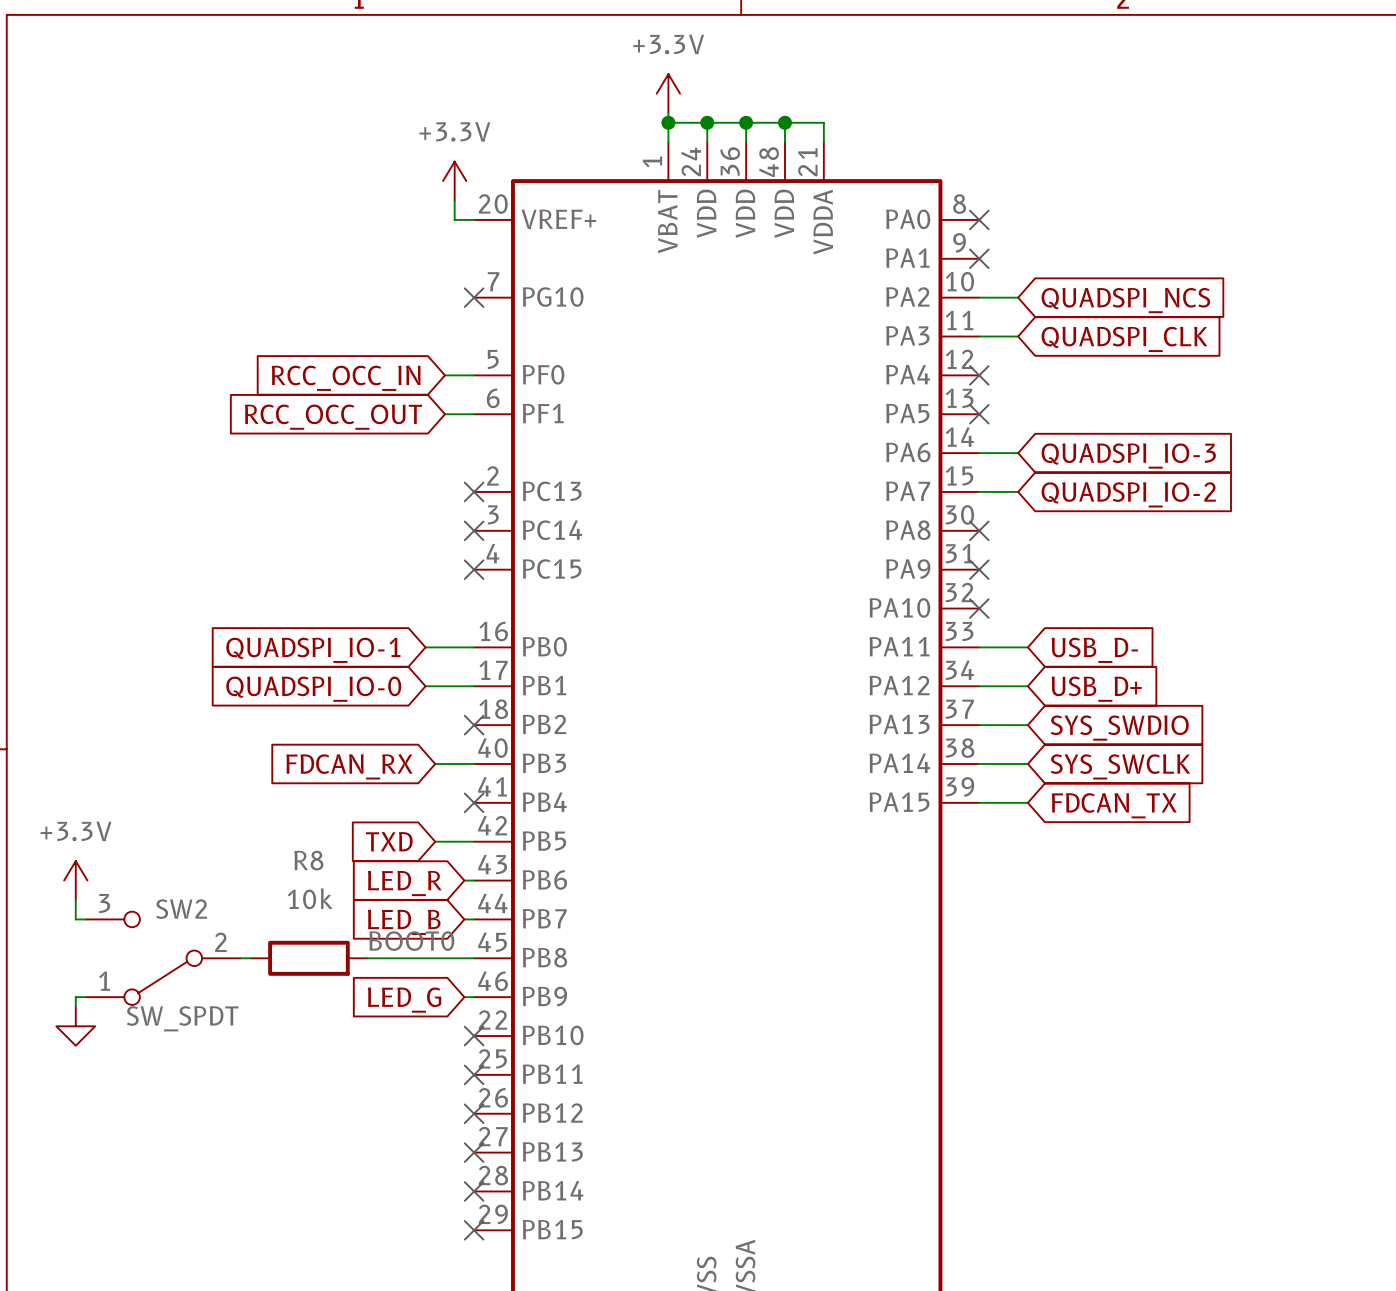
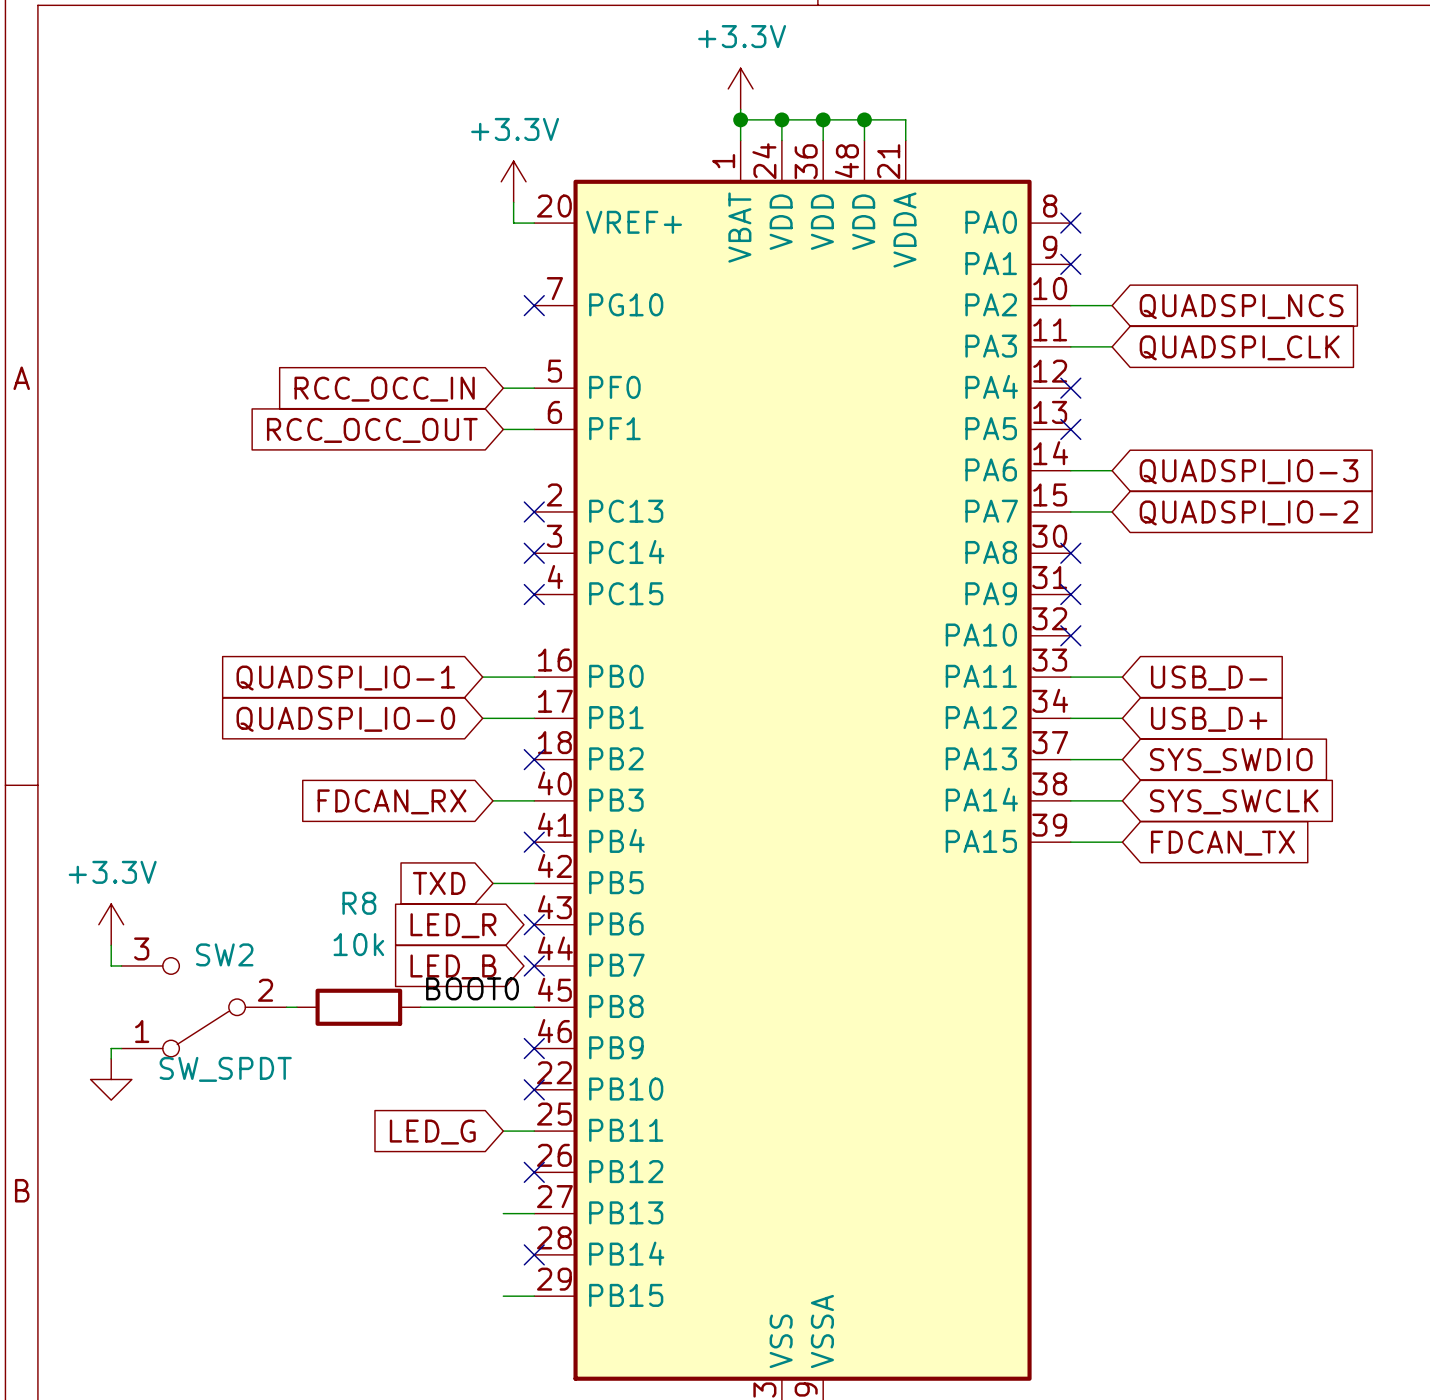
wire: (464, 880) (474, 880) -> none
no-connect mark: none -> (534, 924)
wire: (464, 919) (474, 919) -> none
no-connect mark: none -> (534, 965)
wire: (464, 997) (474, 997) -> none
no-connect mark: none -> (534, 1048)
global label position: LED_G (404, 1000) -> LED_G (432, 1132)
wire: none -> (503, 1131) (534, 1131)
no-connect mark: (474, 1074) -> none
wire: none -> (503, 1213) (534, 1213)
no-connect mark: (474, 1152) -> none
wire: none -> (503, 1296) (534, 1296)
no-connect mark: (474, 1230) -> none

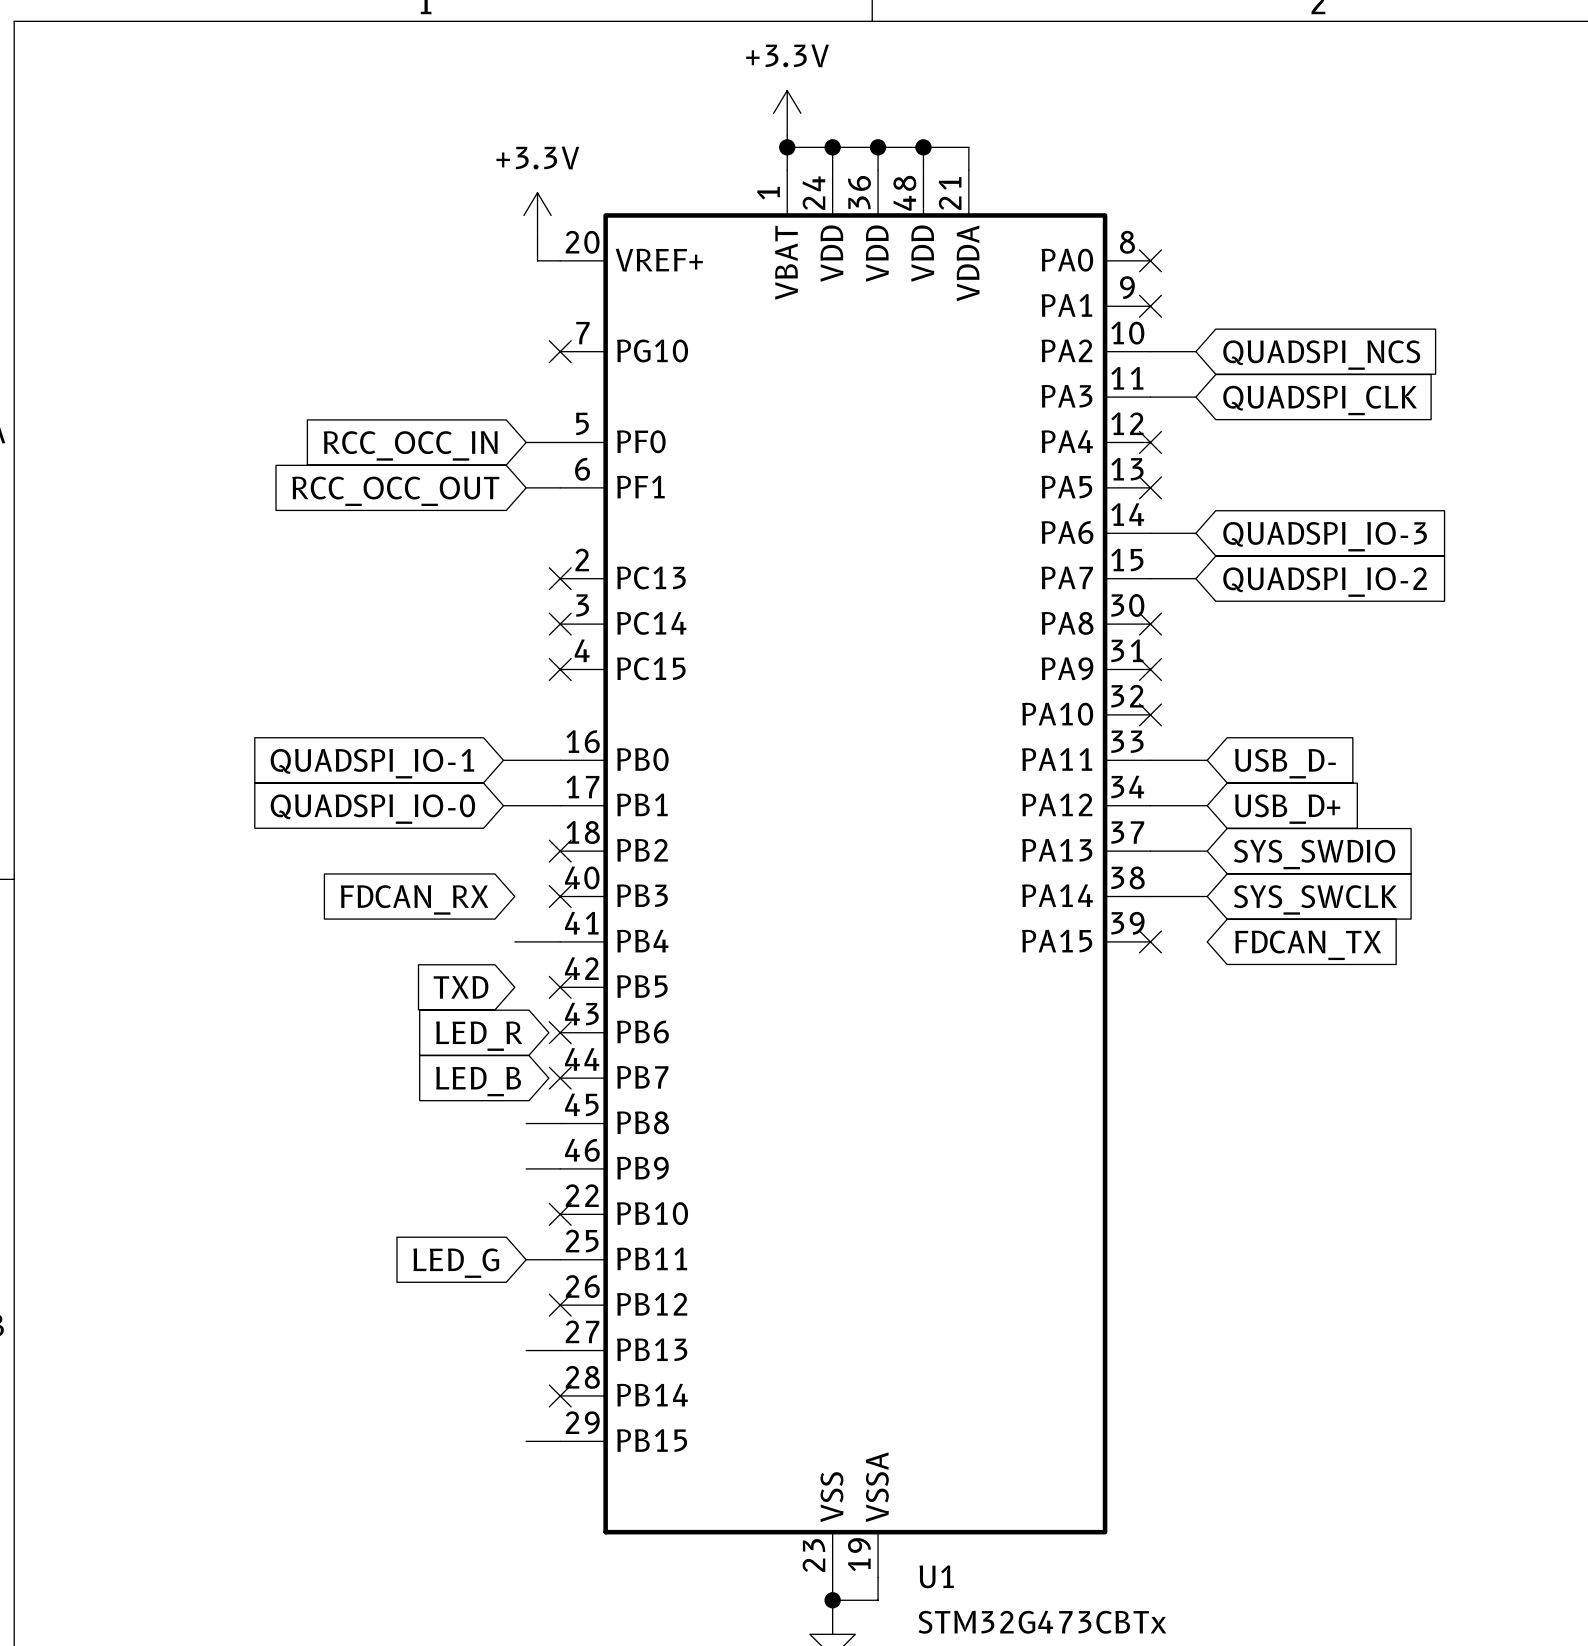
wire: (493, 800) (534, 800) -> (514, 941) (560, 941)
no-connect mark: none -> (560, 896)
no-connect mark: (534, 842) -> none
wire: (1070, 842) (1122, 842) -> none
no-connect mark: none -> (1150, 941)
wire: (493, 883) (534, 883) -> none
no-connect mark: none -> (560, 987)
power symbol: +3.3V (111, 924) -> none
wire: (111, 945) (111, 965) (121, 965) -> none
label: BOOT0 (472, 988) -> none
SW2: SW_SPDT (204, 1007) -> none
wire: (286, 1007) (296, 1007) -> none
R8: 10k (358, 1007) -> none
wire: (420, 1007) (503, 1007) -> none
wire: (121, 1048) (111, 1048) (111, 1058) -> none
wire: none -> (526, 1168) (560, 1168)
no-connect mark: (534, 1048) -> none
power symbol: (111, 1079) -> none

